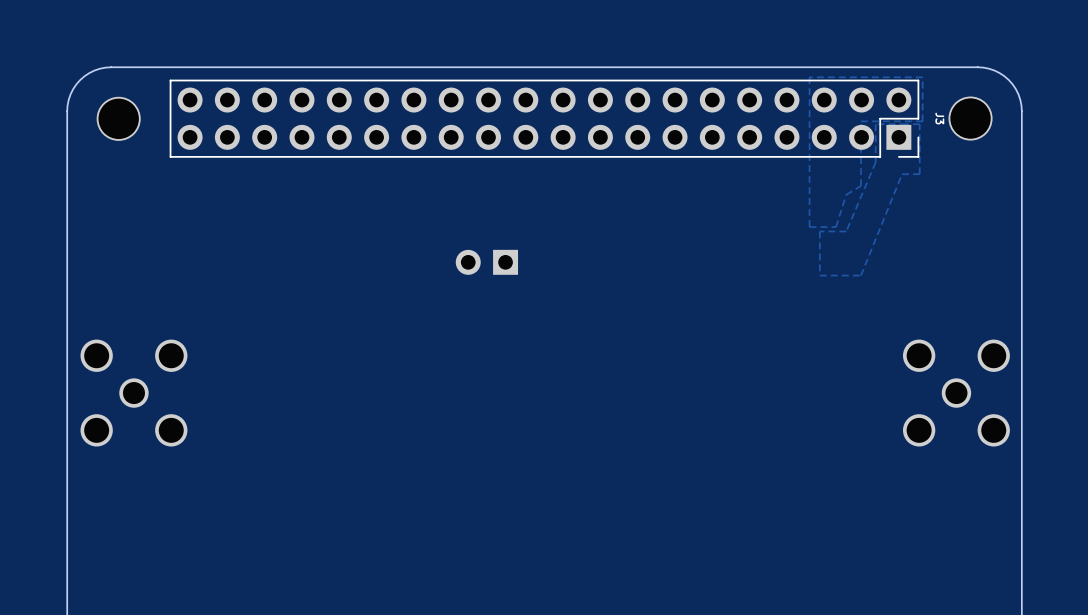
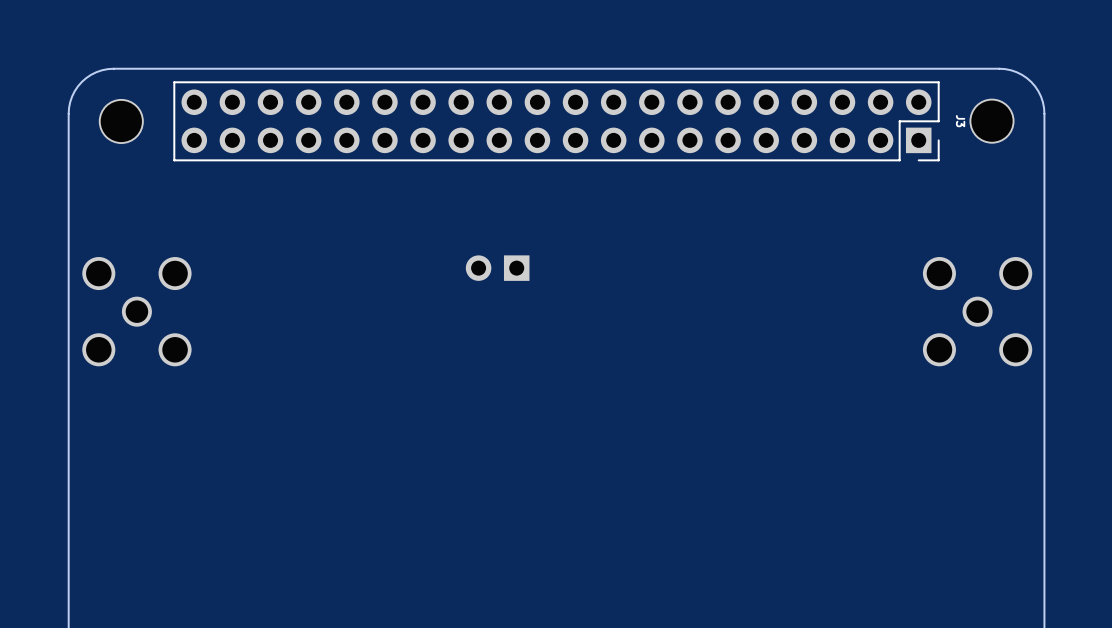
zone outline: (922, 77) (922, 121) (860, 121) (860, 185) (846, 194) (836, 227) (809, 227) (809, 77) (922, 77) -> none
zone outline: (919, 124) (919, 174) (902, 174) (860, 275) (819, 275) (819, 231) (846, 231) (875, 162) (875, 124) (919, 124) -> none
part position: (133, 393) -> (136, 311)
part position: (956, 393) -> (977, 311)

